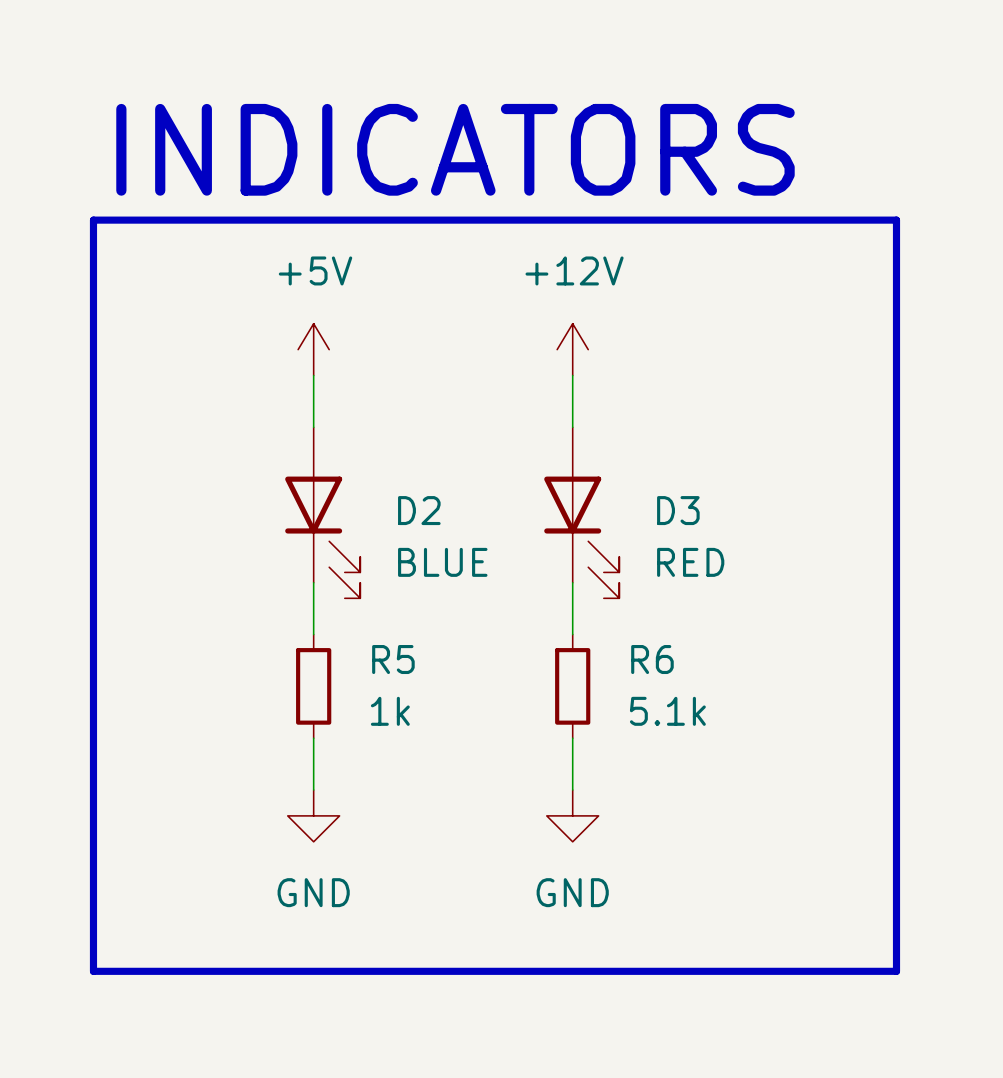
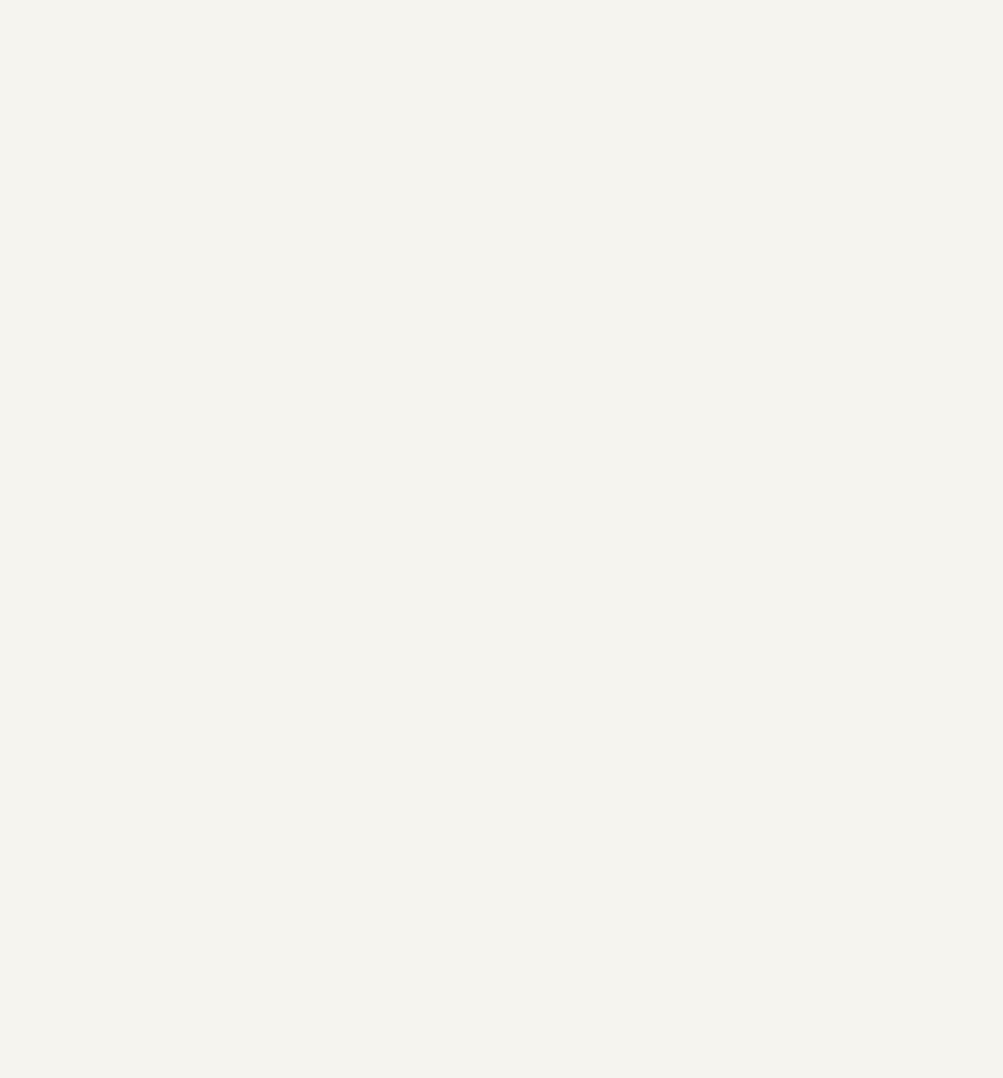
text: INDICATORS (455, 149) -> none
line: (93, 220) (896, 220) (896, 971) (93, 971) (93, 220) -> none
power symbol: +5V (313, 349) -> none
power symbol: +12V (572, 349) -> none
wire: (313, 375) (313, 427) -> none
wire: (572, 375) (572, 427) -> none
D2: BLUE (322, 512) -> none
D3: RED (581, 512) -> none
wire: (313, 582) (313, 634) -> none
wire: (572, 582) (572, 634) -> none
R5: 1k (313, 686) -> none
R6: 5.1k (572, 686) -> none
wire: (313, 738) (313, 790) -> none
wire: (572, 738) (572, 790) -> none
power symbol: GND (313, 815) -> none
power symbol: GND (572, 815) -> none

